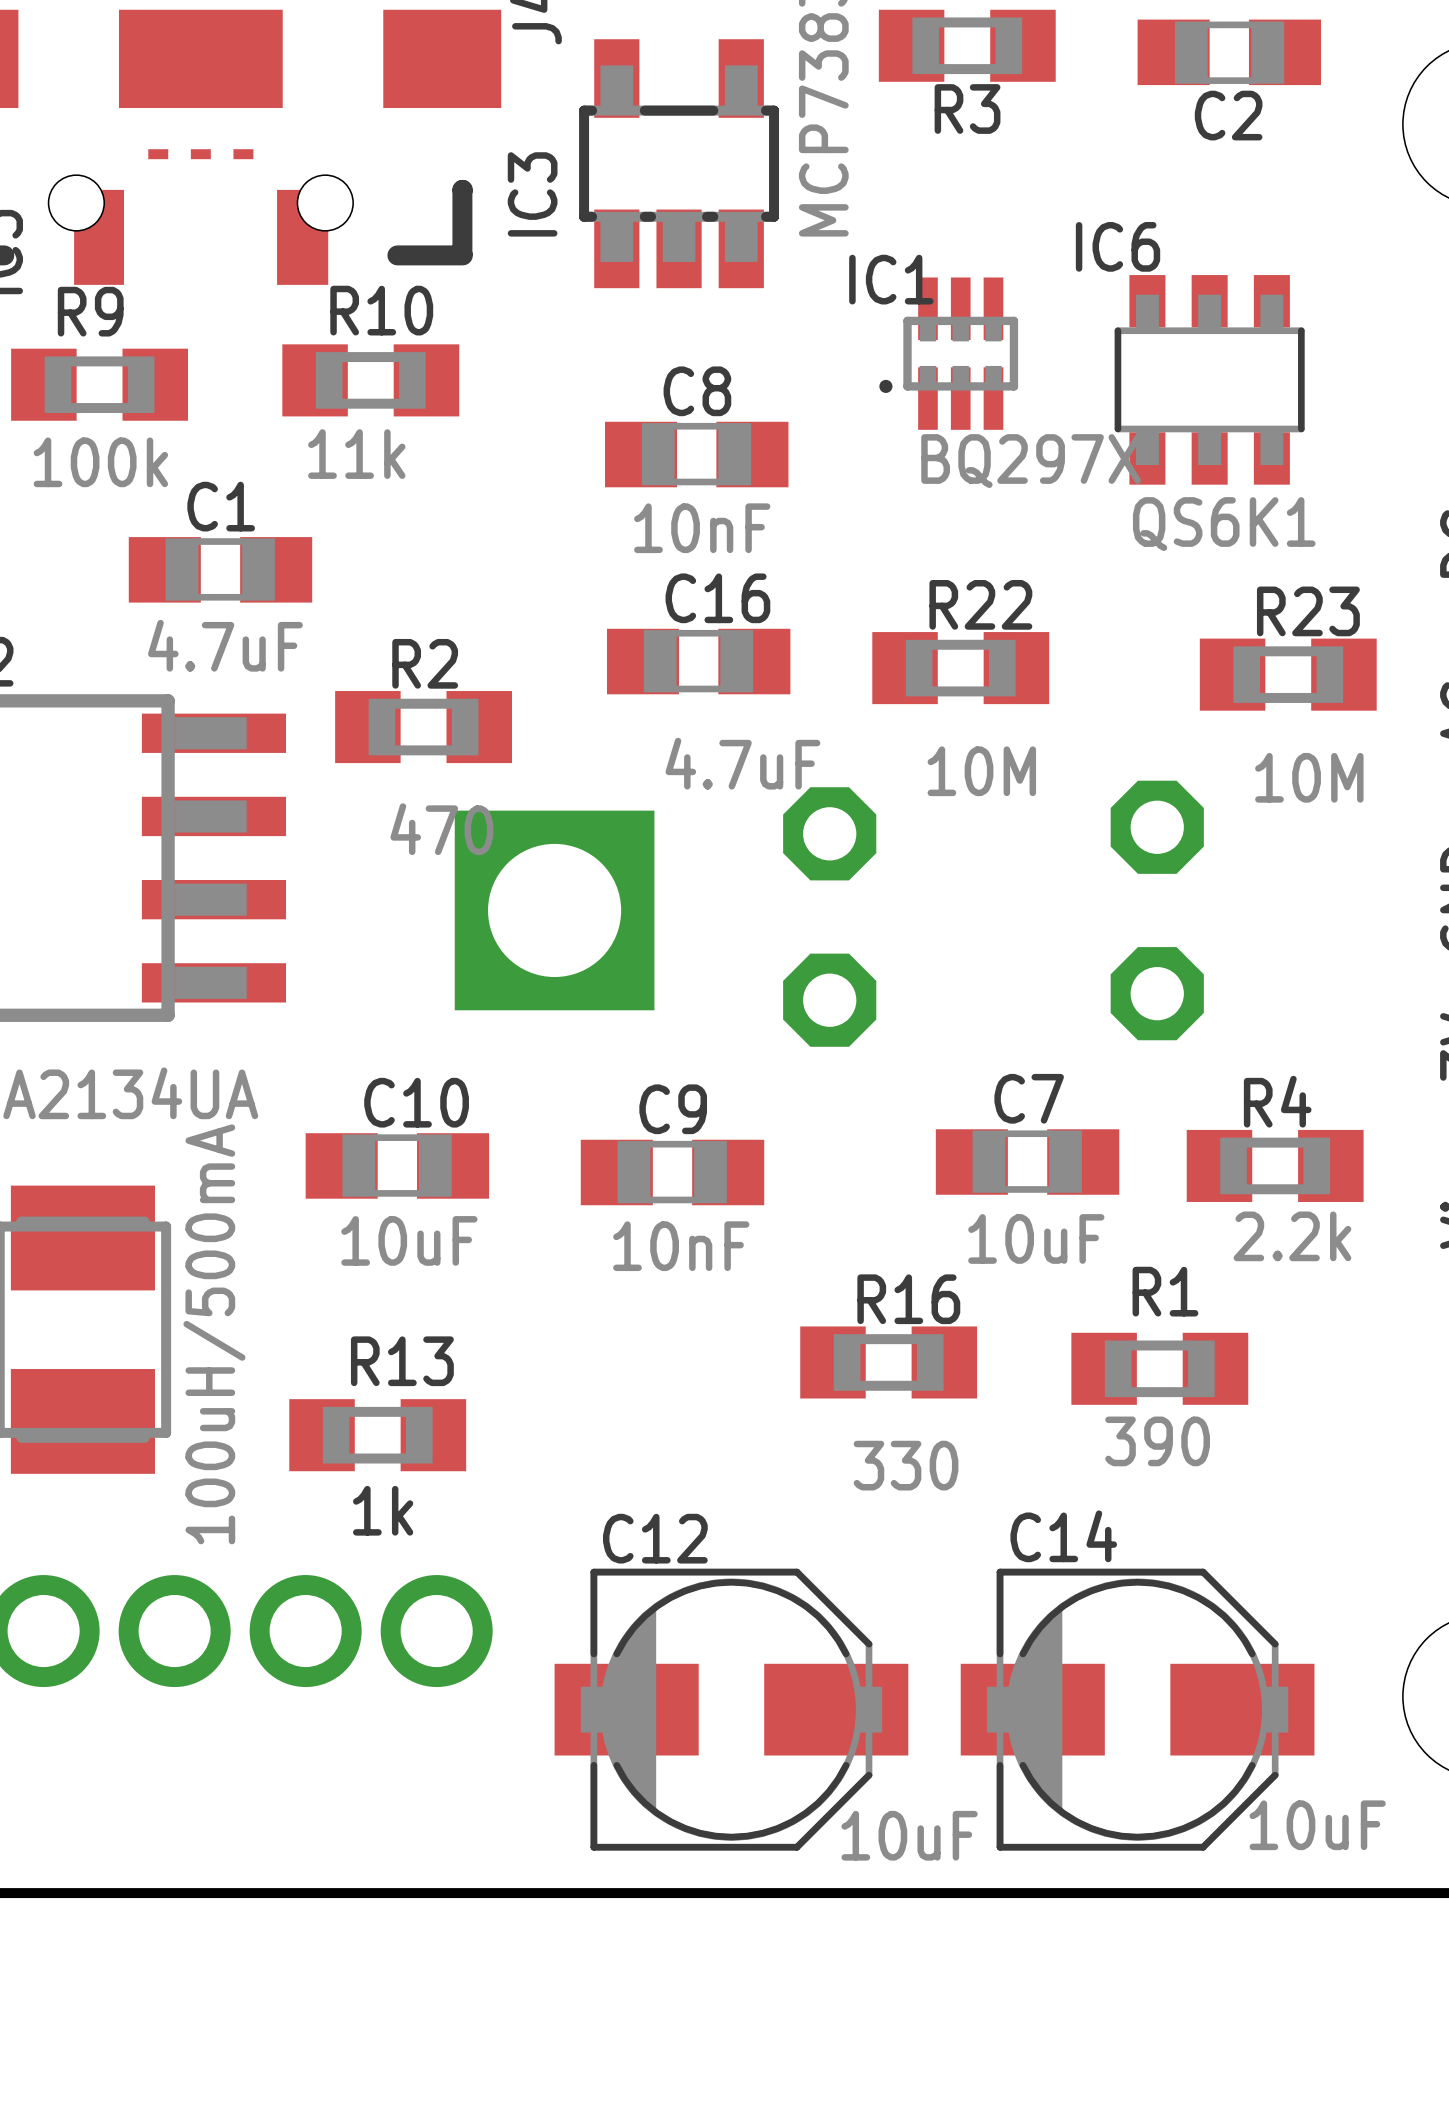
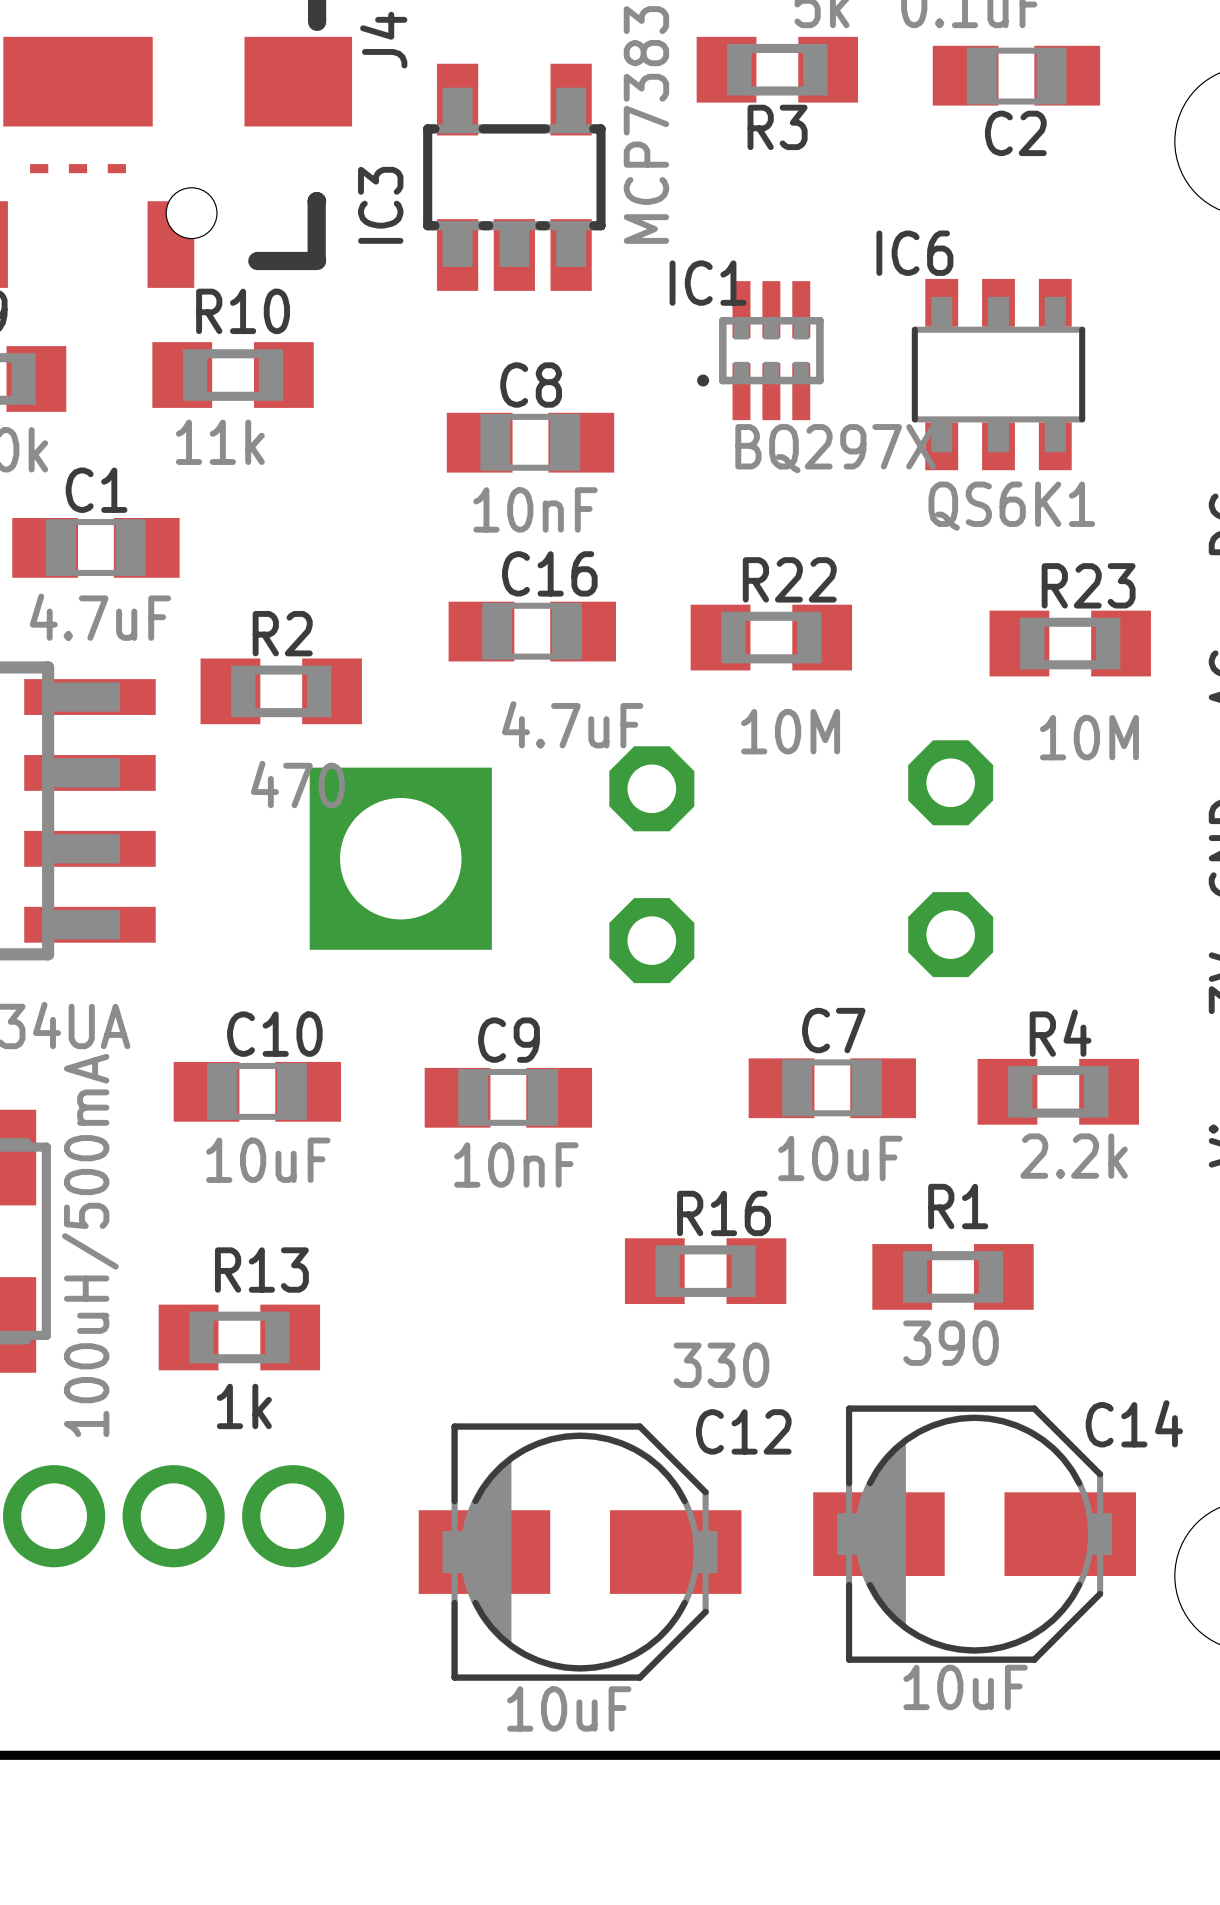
C14 name position: C14 (1063, 1536) -> C14 (1134, 1423)
C12 name position: C12 (655, 1538) -> C12 (743, 1431)
C12 position: (731, 1709) -> (580, 1552)
C14 position: (1137, 1709) -> (974, 1534)
C14 value position: 10uF (1317, 1825) -> 10uF (965, 1687)
C12 value position: 10uF (909, 1835) -> 10uF (569, 1708)

